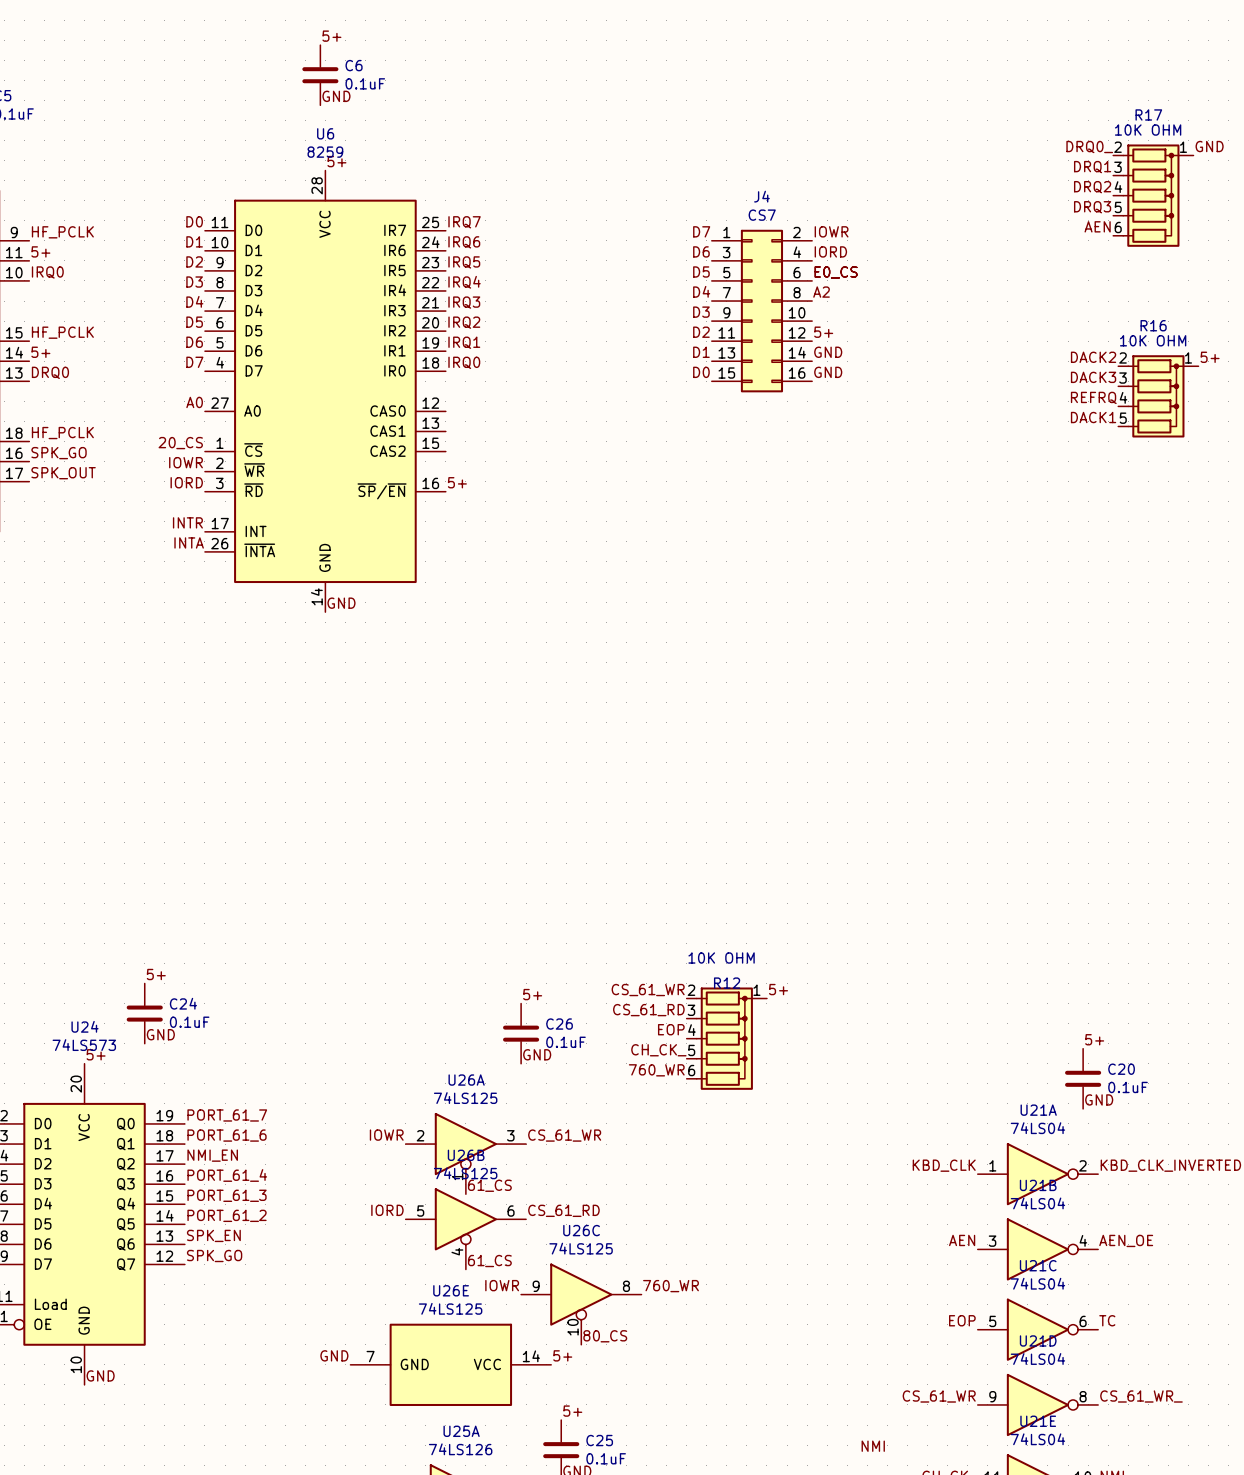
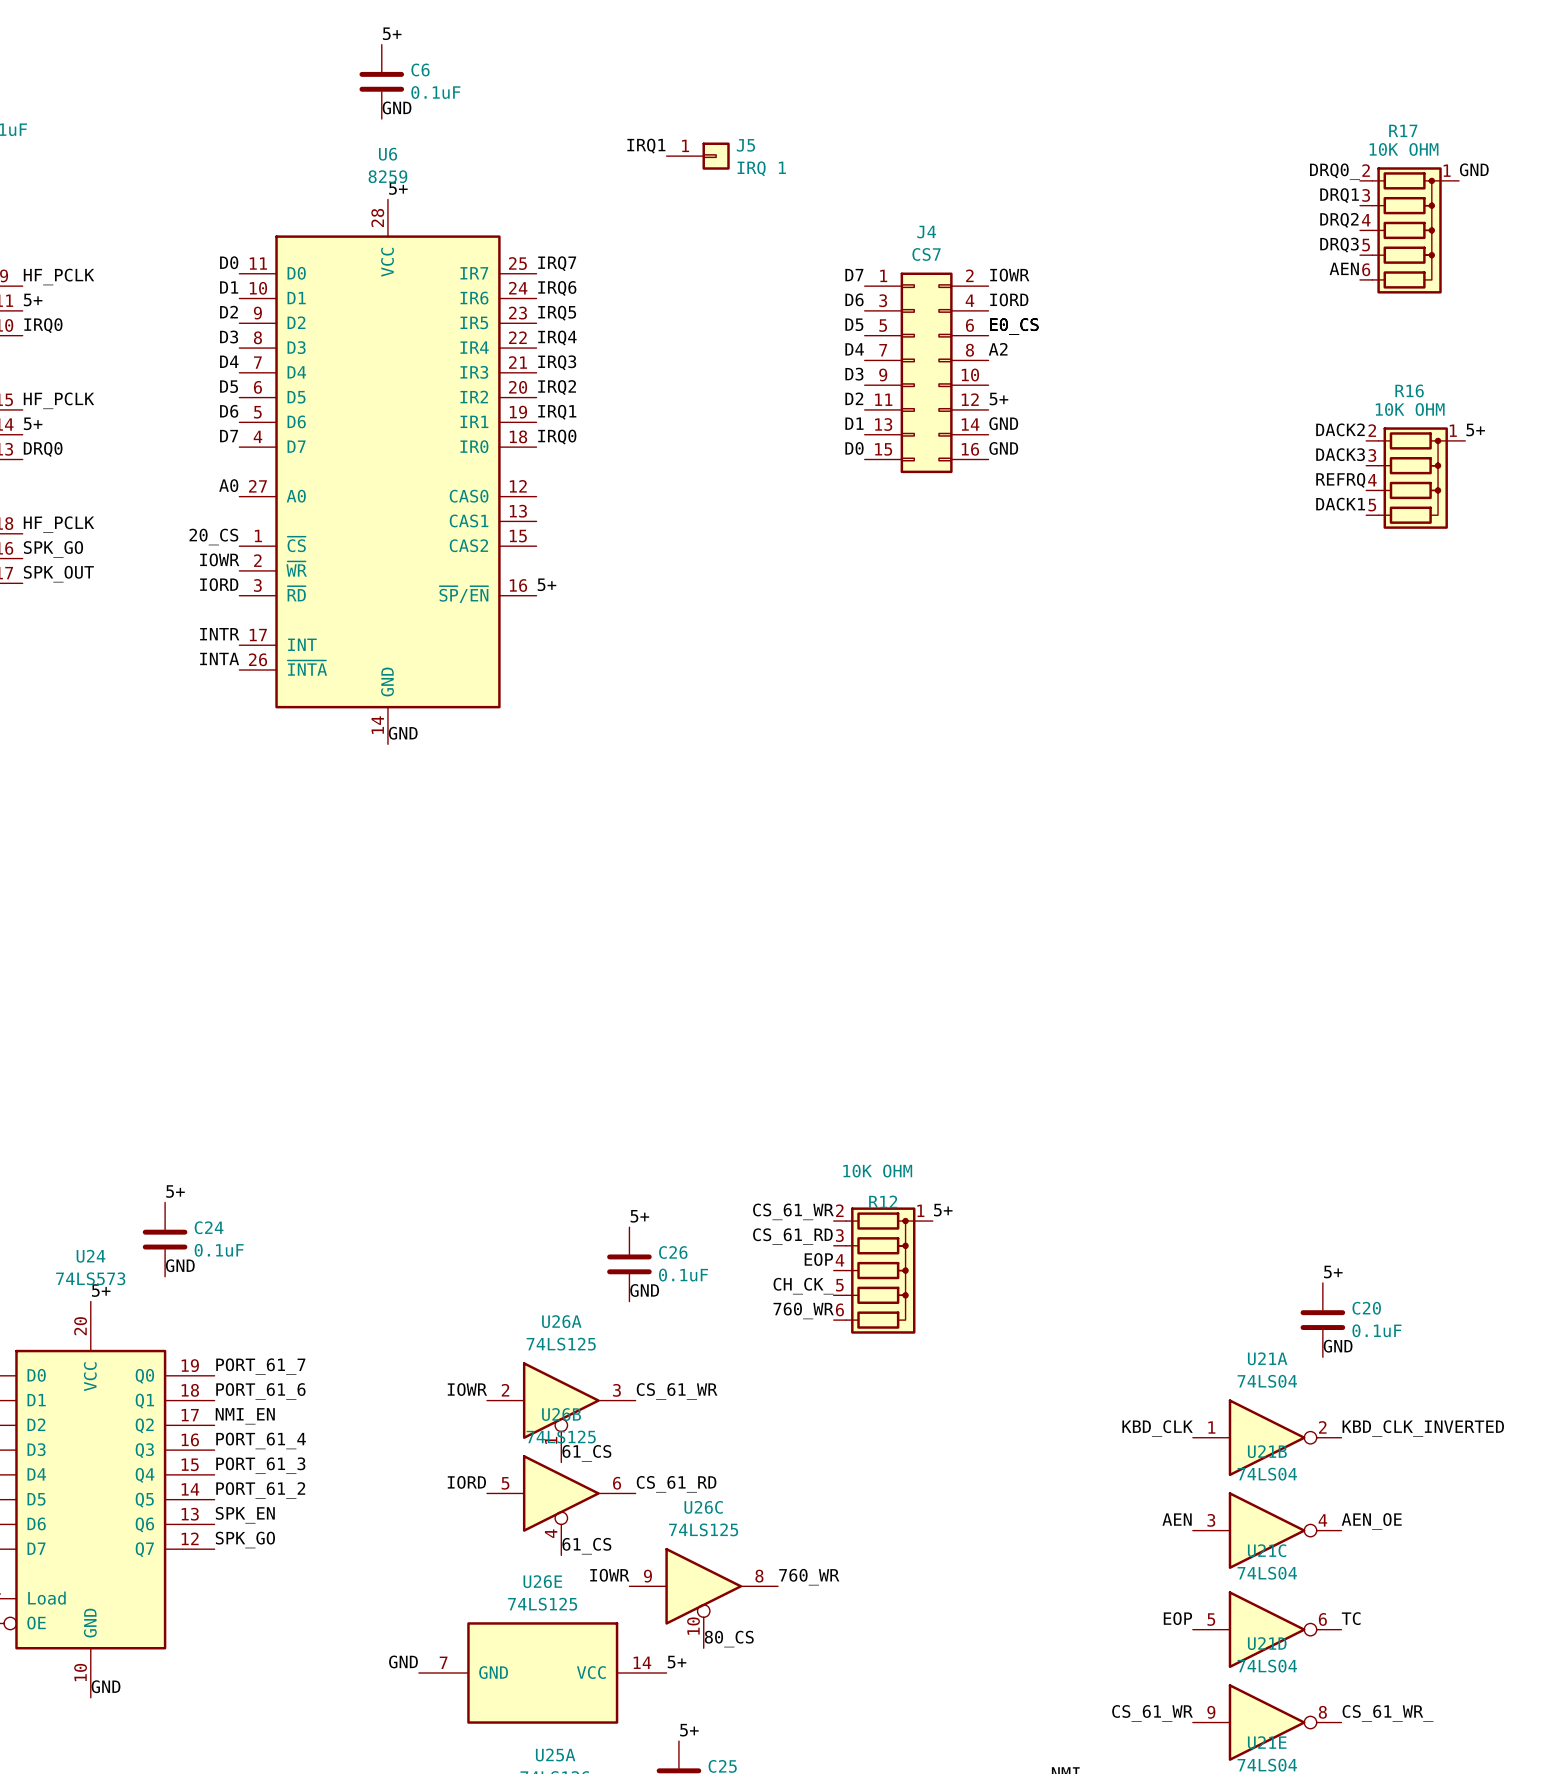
label: none -> IRQ1 (646, 146)
J5: none -> IRQ 1 (698, 156)

